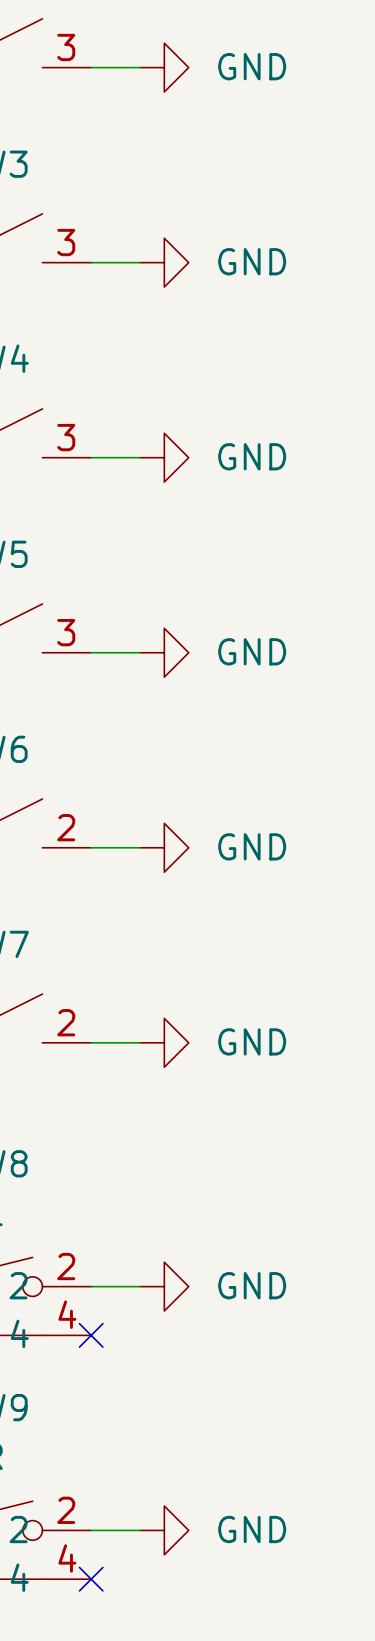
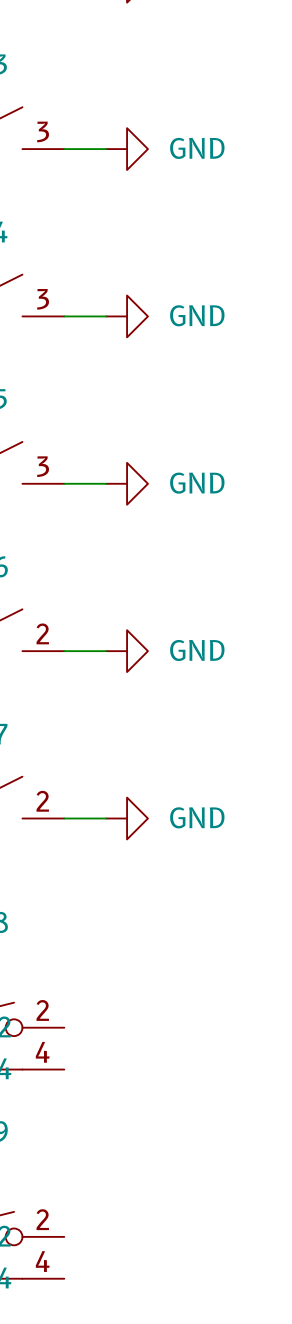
wire: (91, 1286) (139, 1286) -> none
power symbol: GND (164, 1286) -> none
no-connect mark: (91, 1335) -> none
wire: (91, 1530) (139, 1530) -> none
power symbol: GND (164, 1530) -> none
no-connect mark: (91, 1579) -> none

